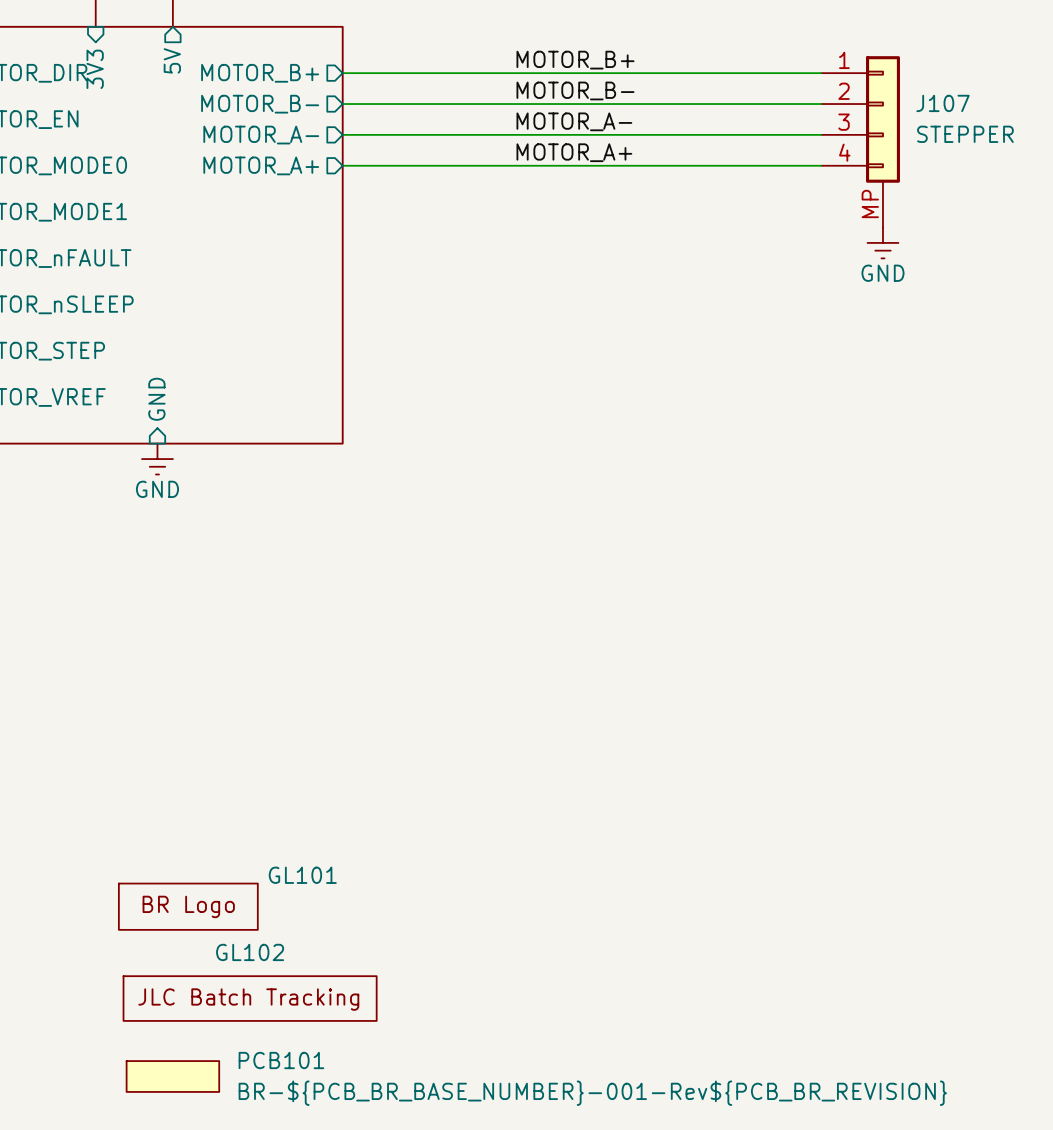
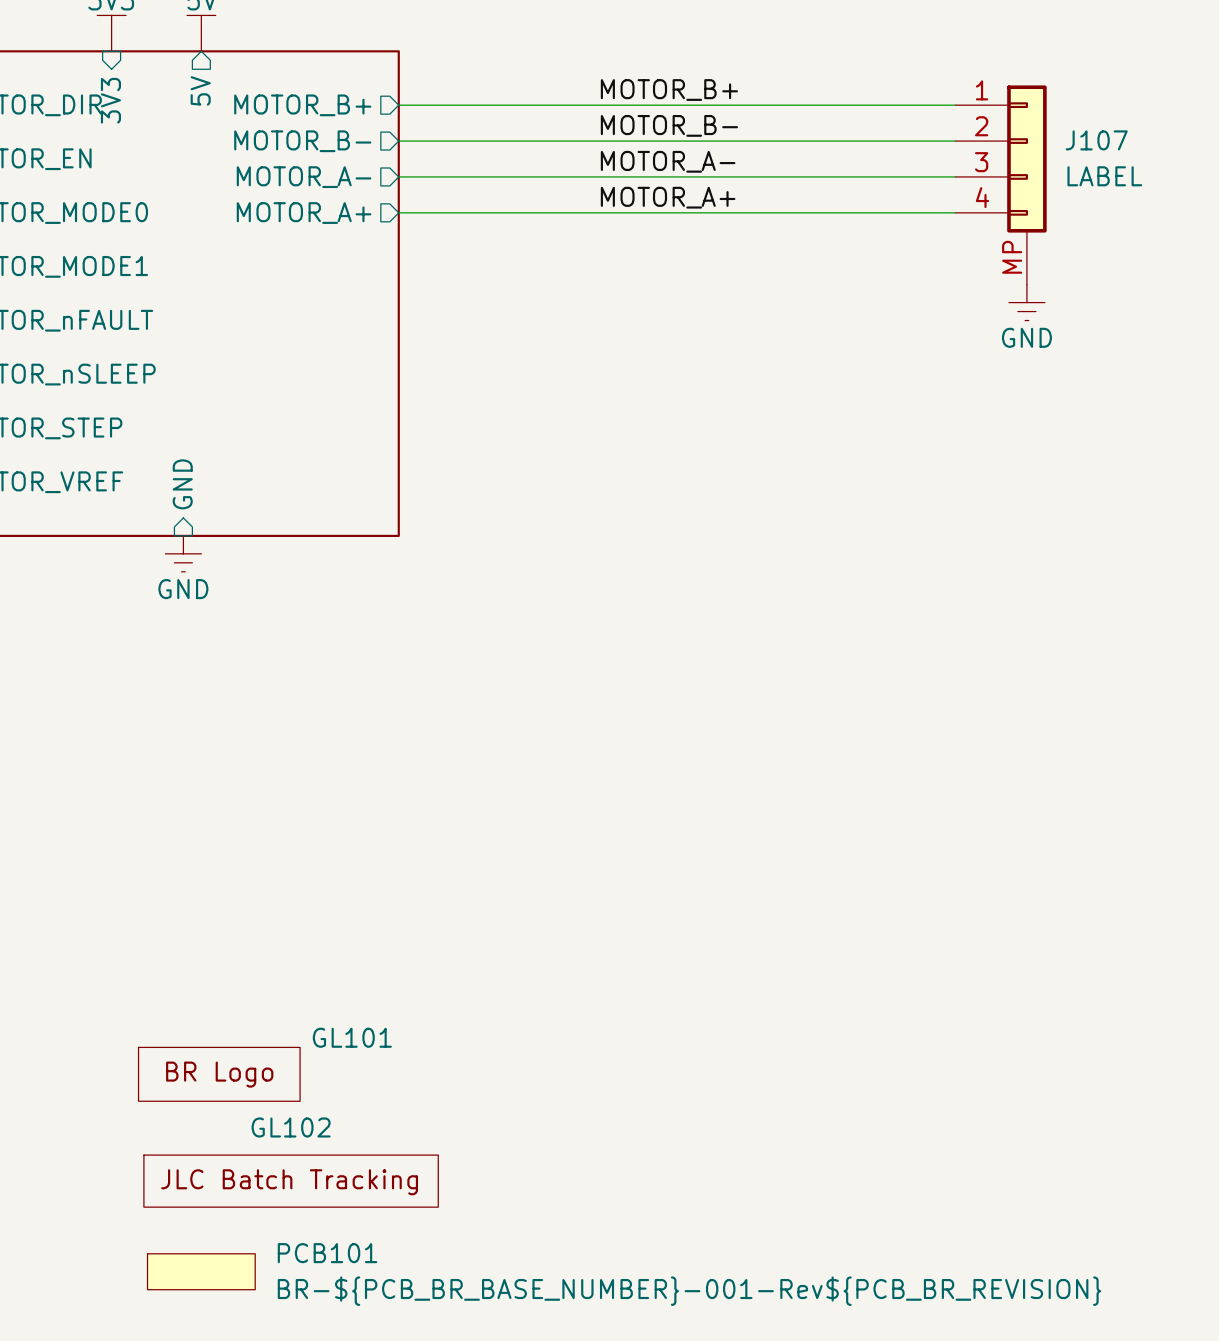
J107 value: STEPPER (965, 134) -> LABEL (1104, 176)

